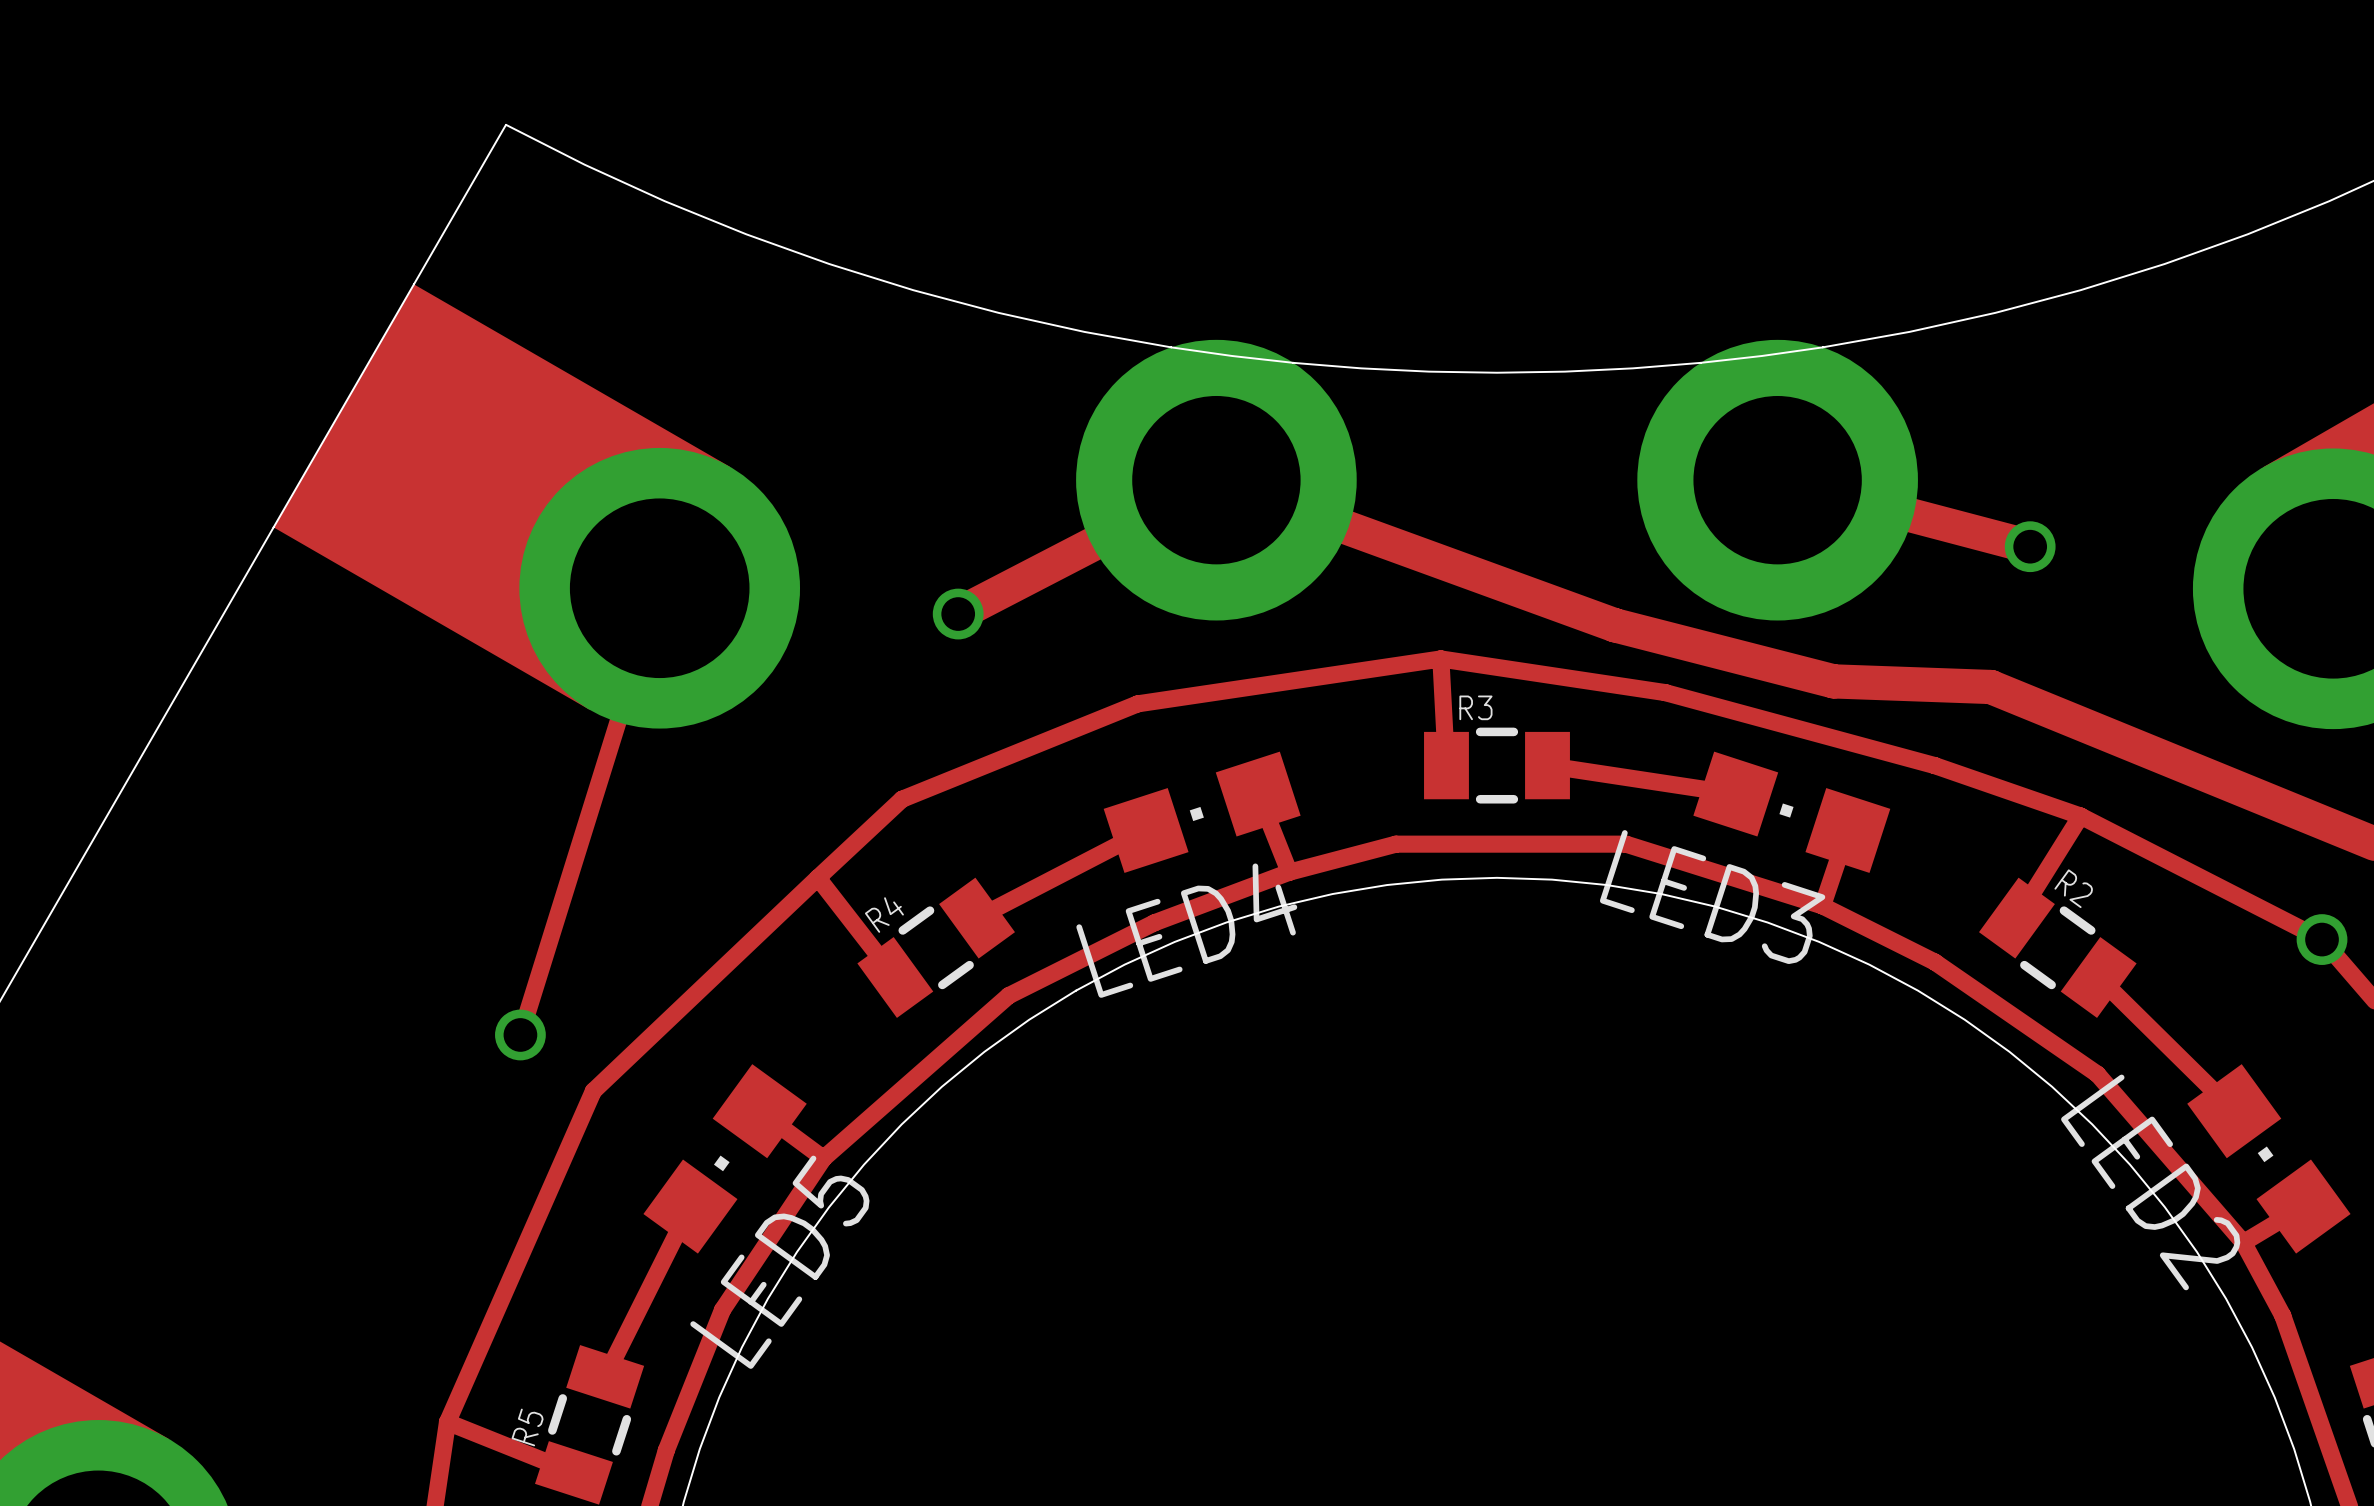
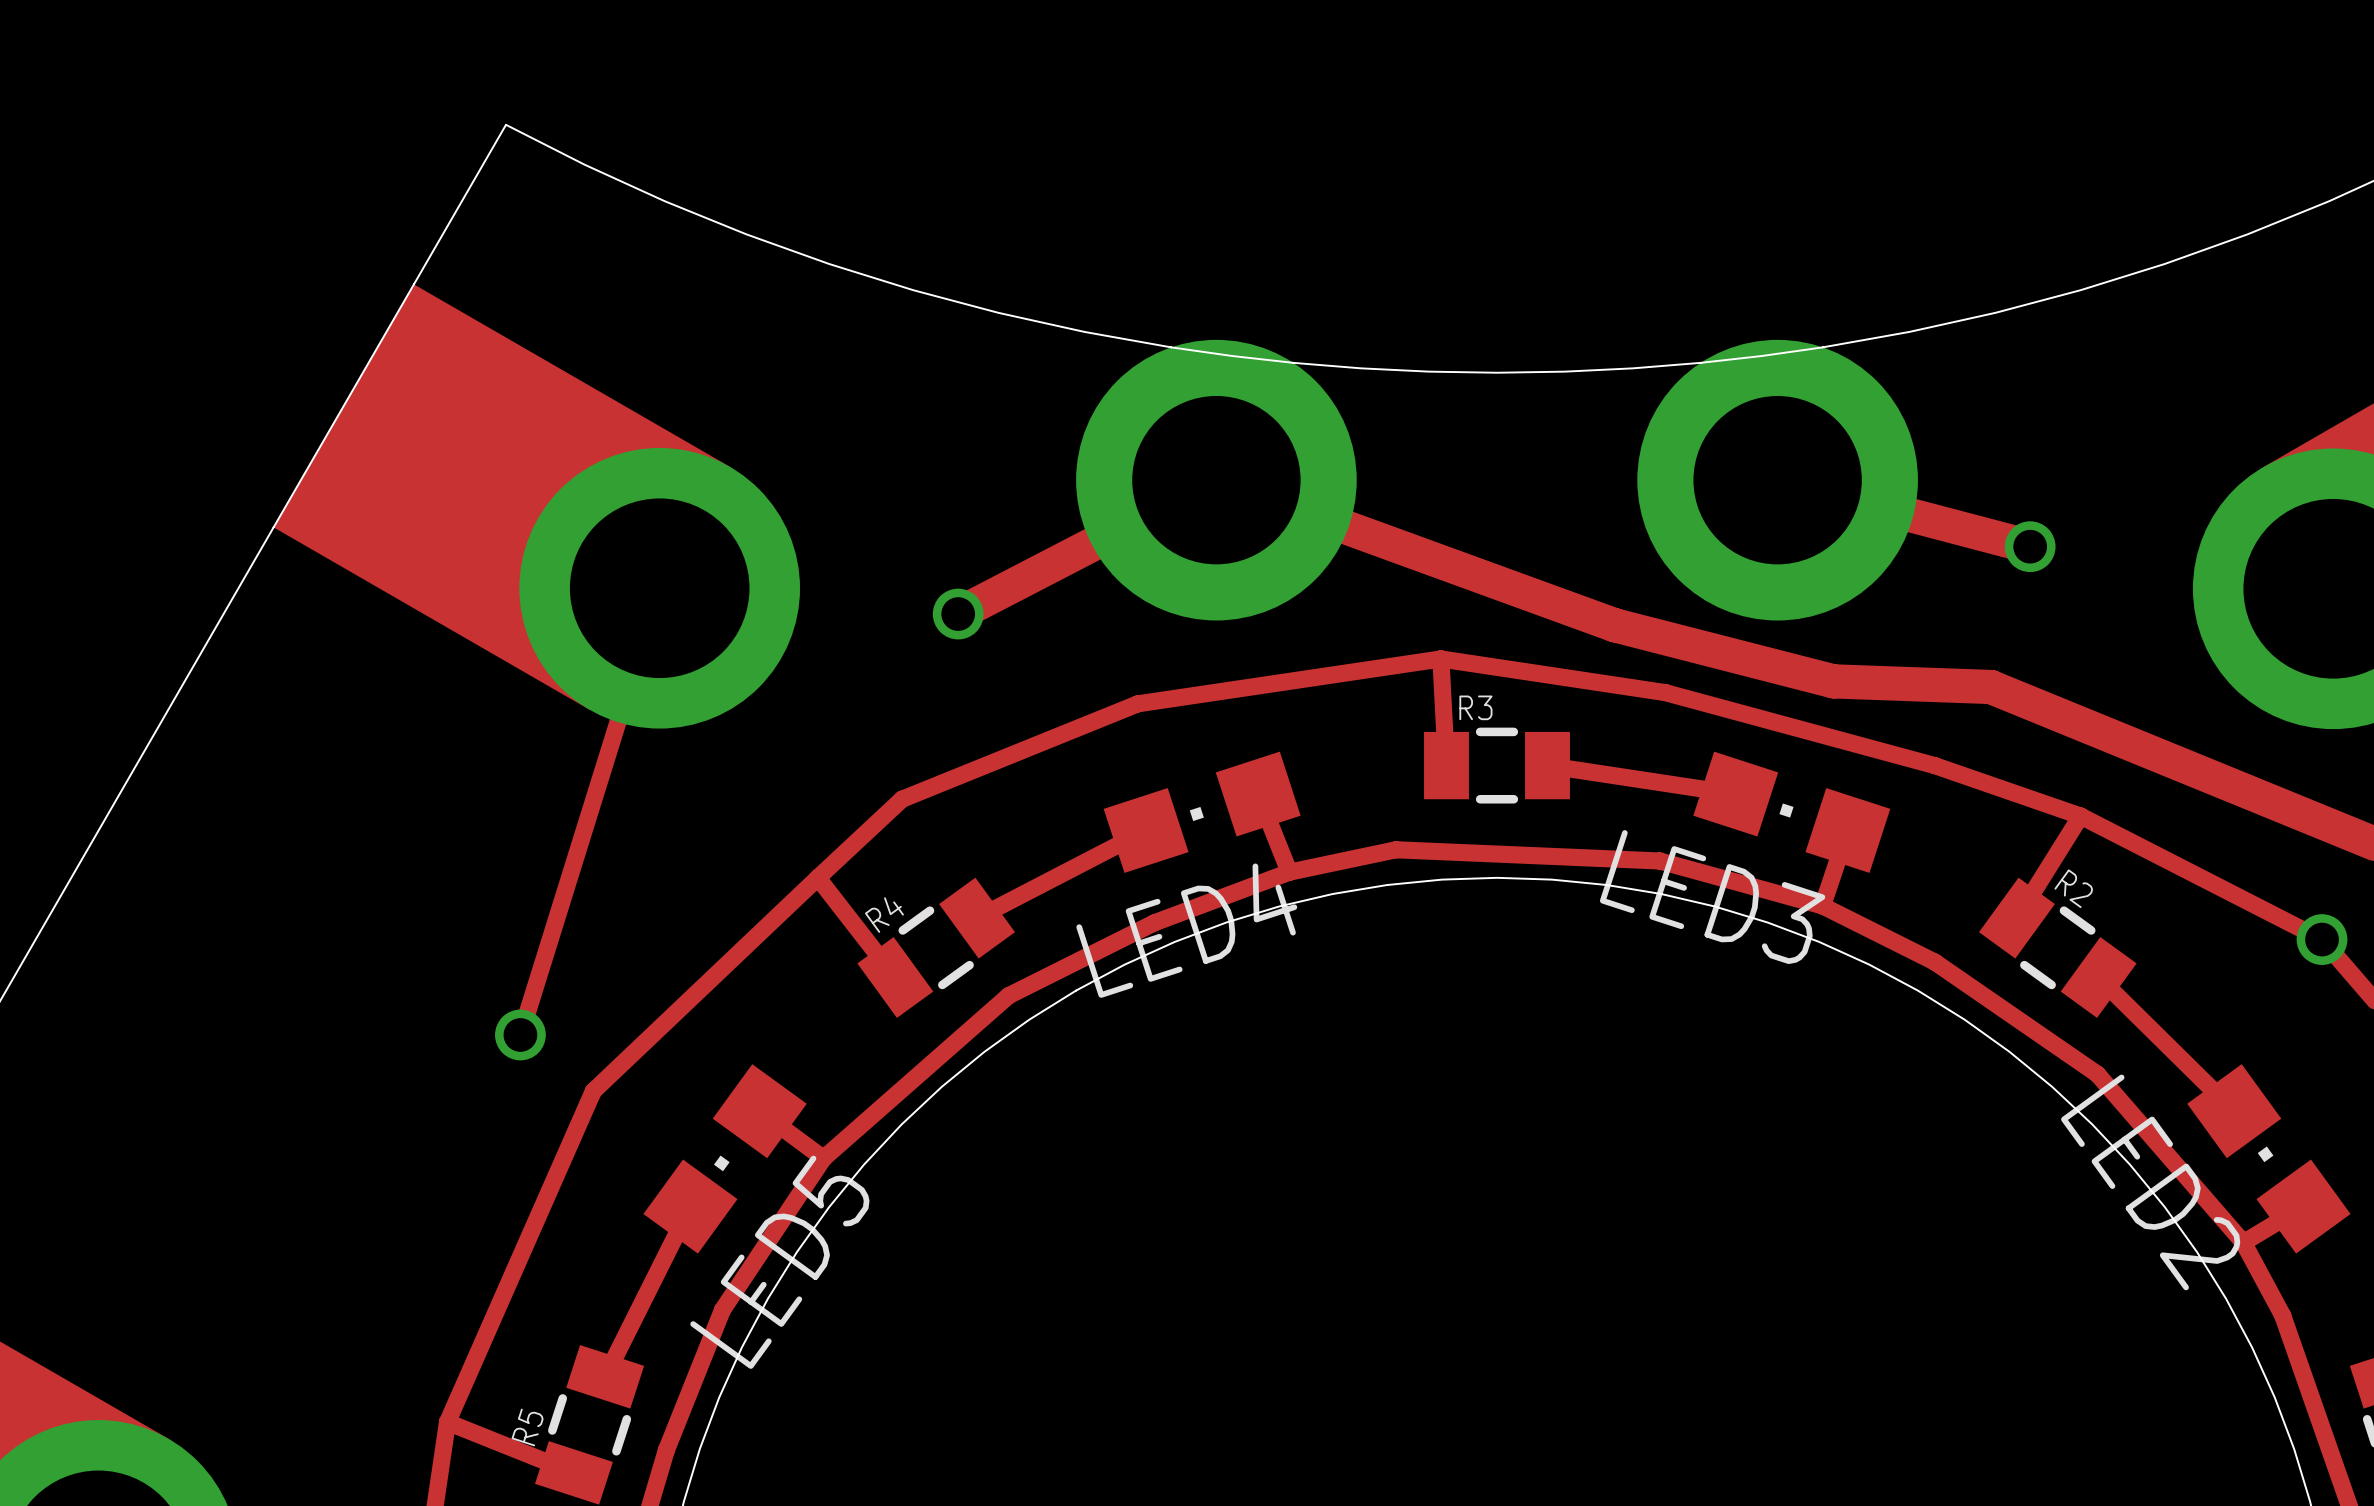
track: (1289, 872) (1395, 844) (1626, 844) (1822, 905) -> (1289, 872) (1395, 849) (1659, 860) (1822, 905)

